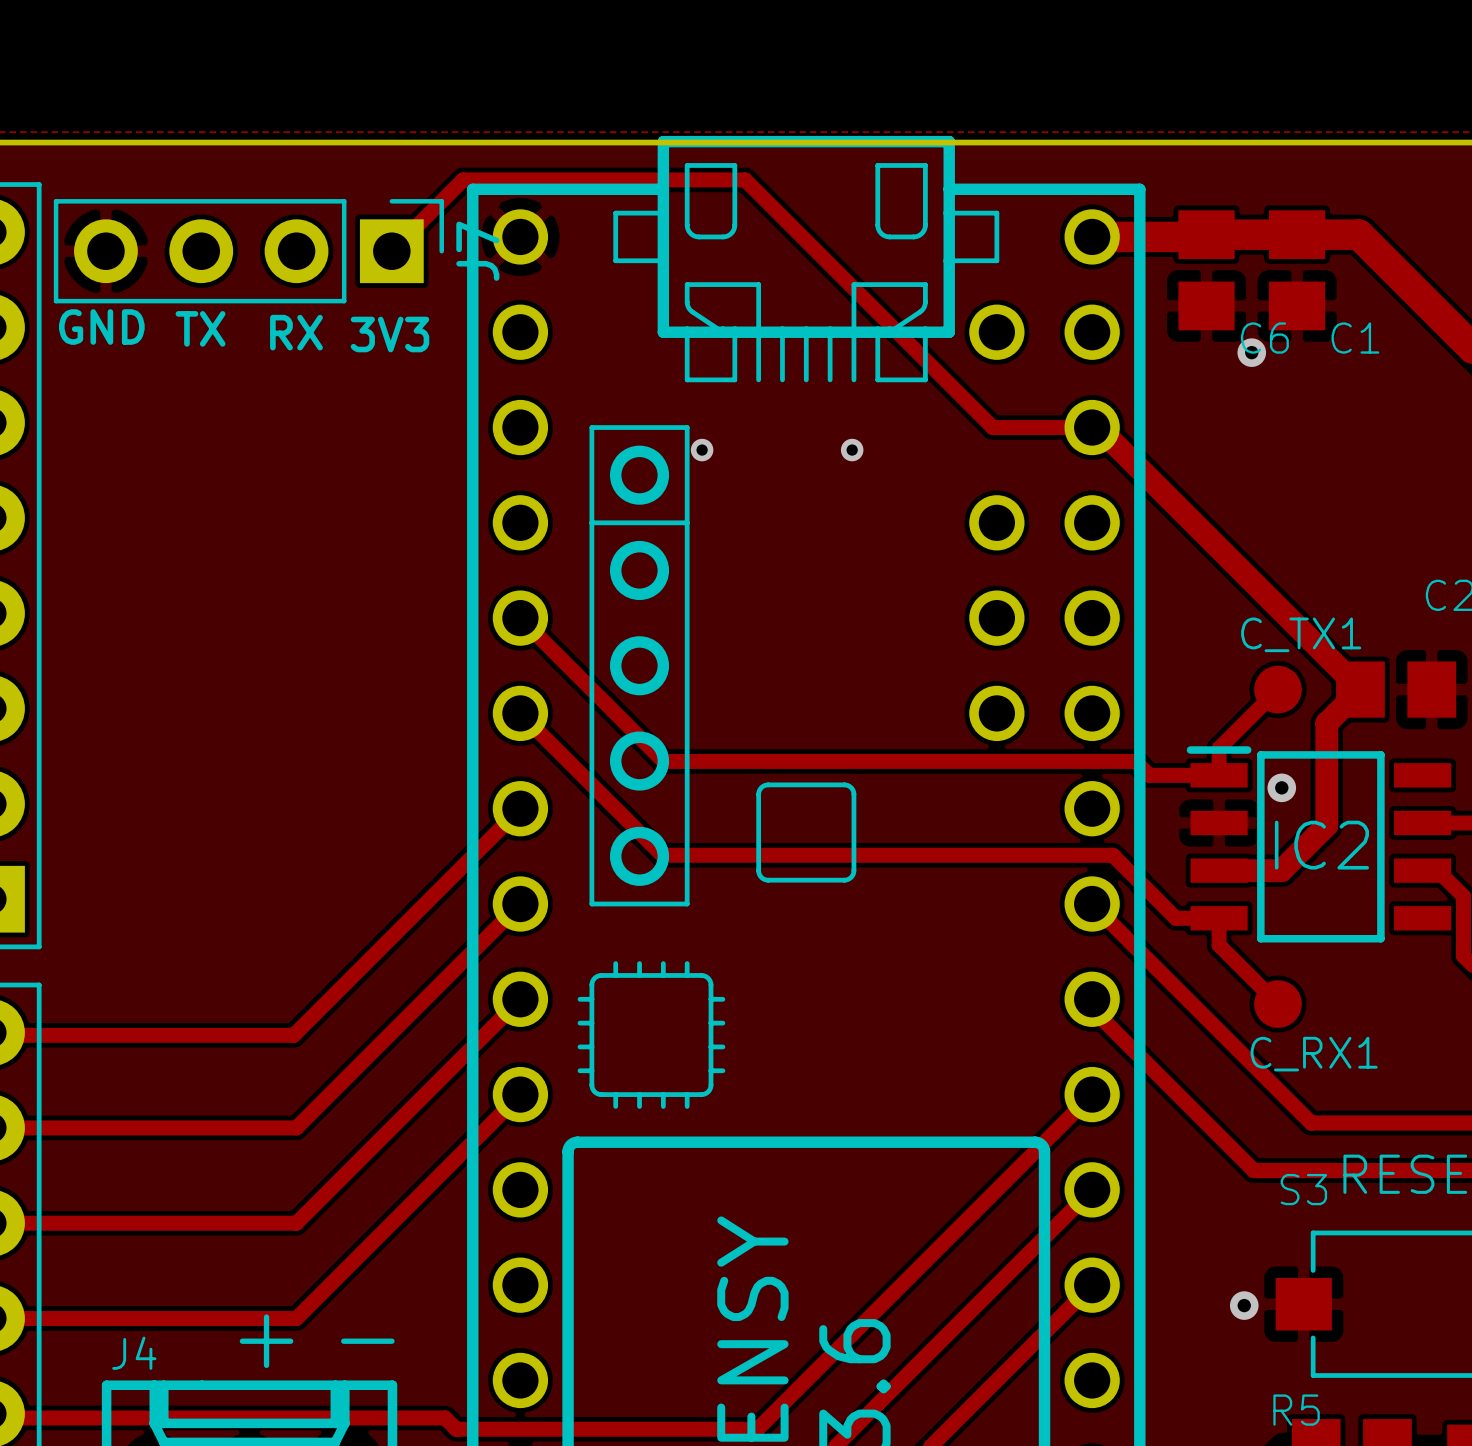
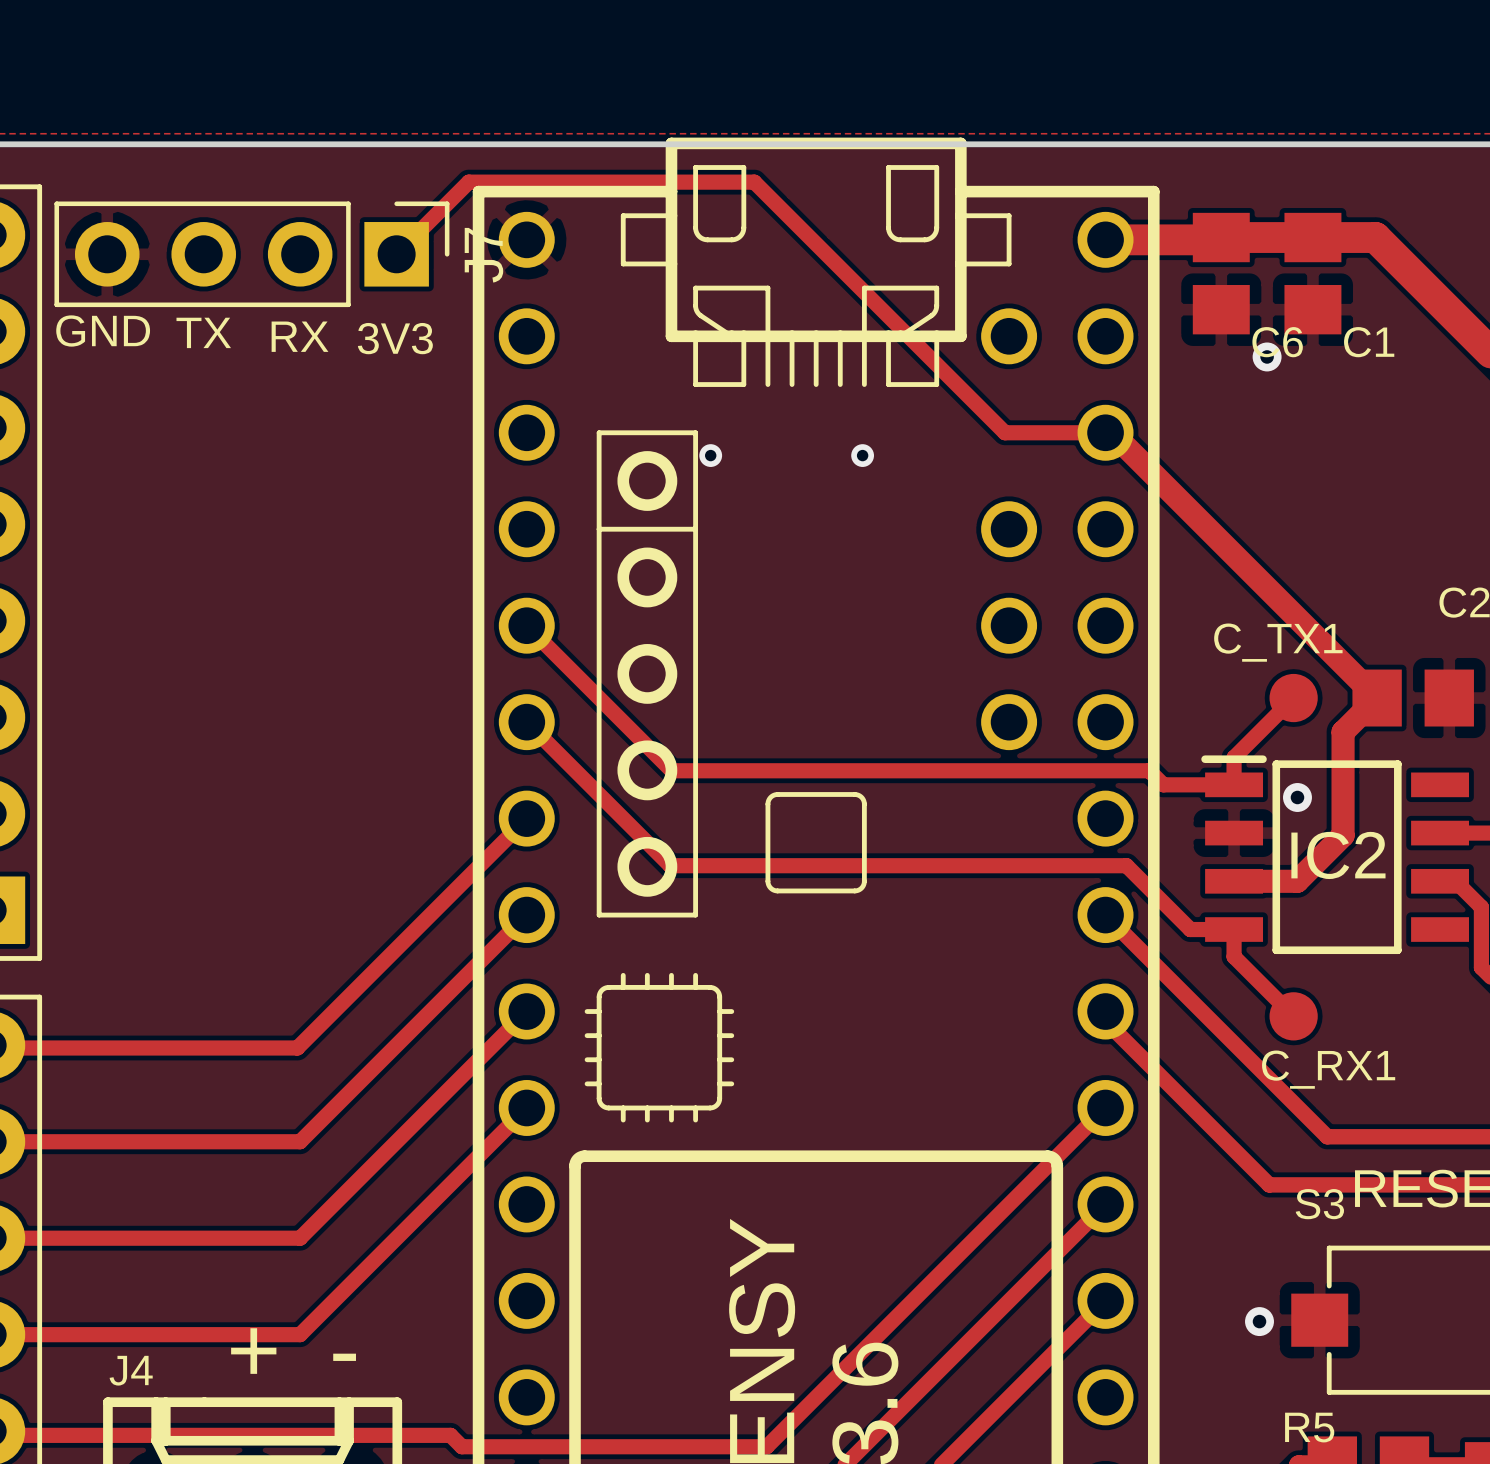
C_TX1 name position: C_TX1 (1301, 634) -> C_TX1 (1278, 642)

